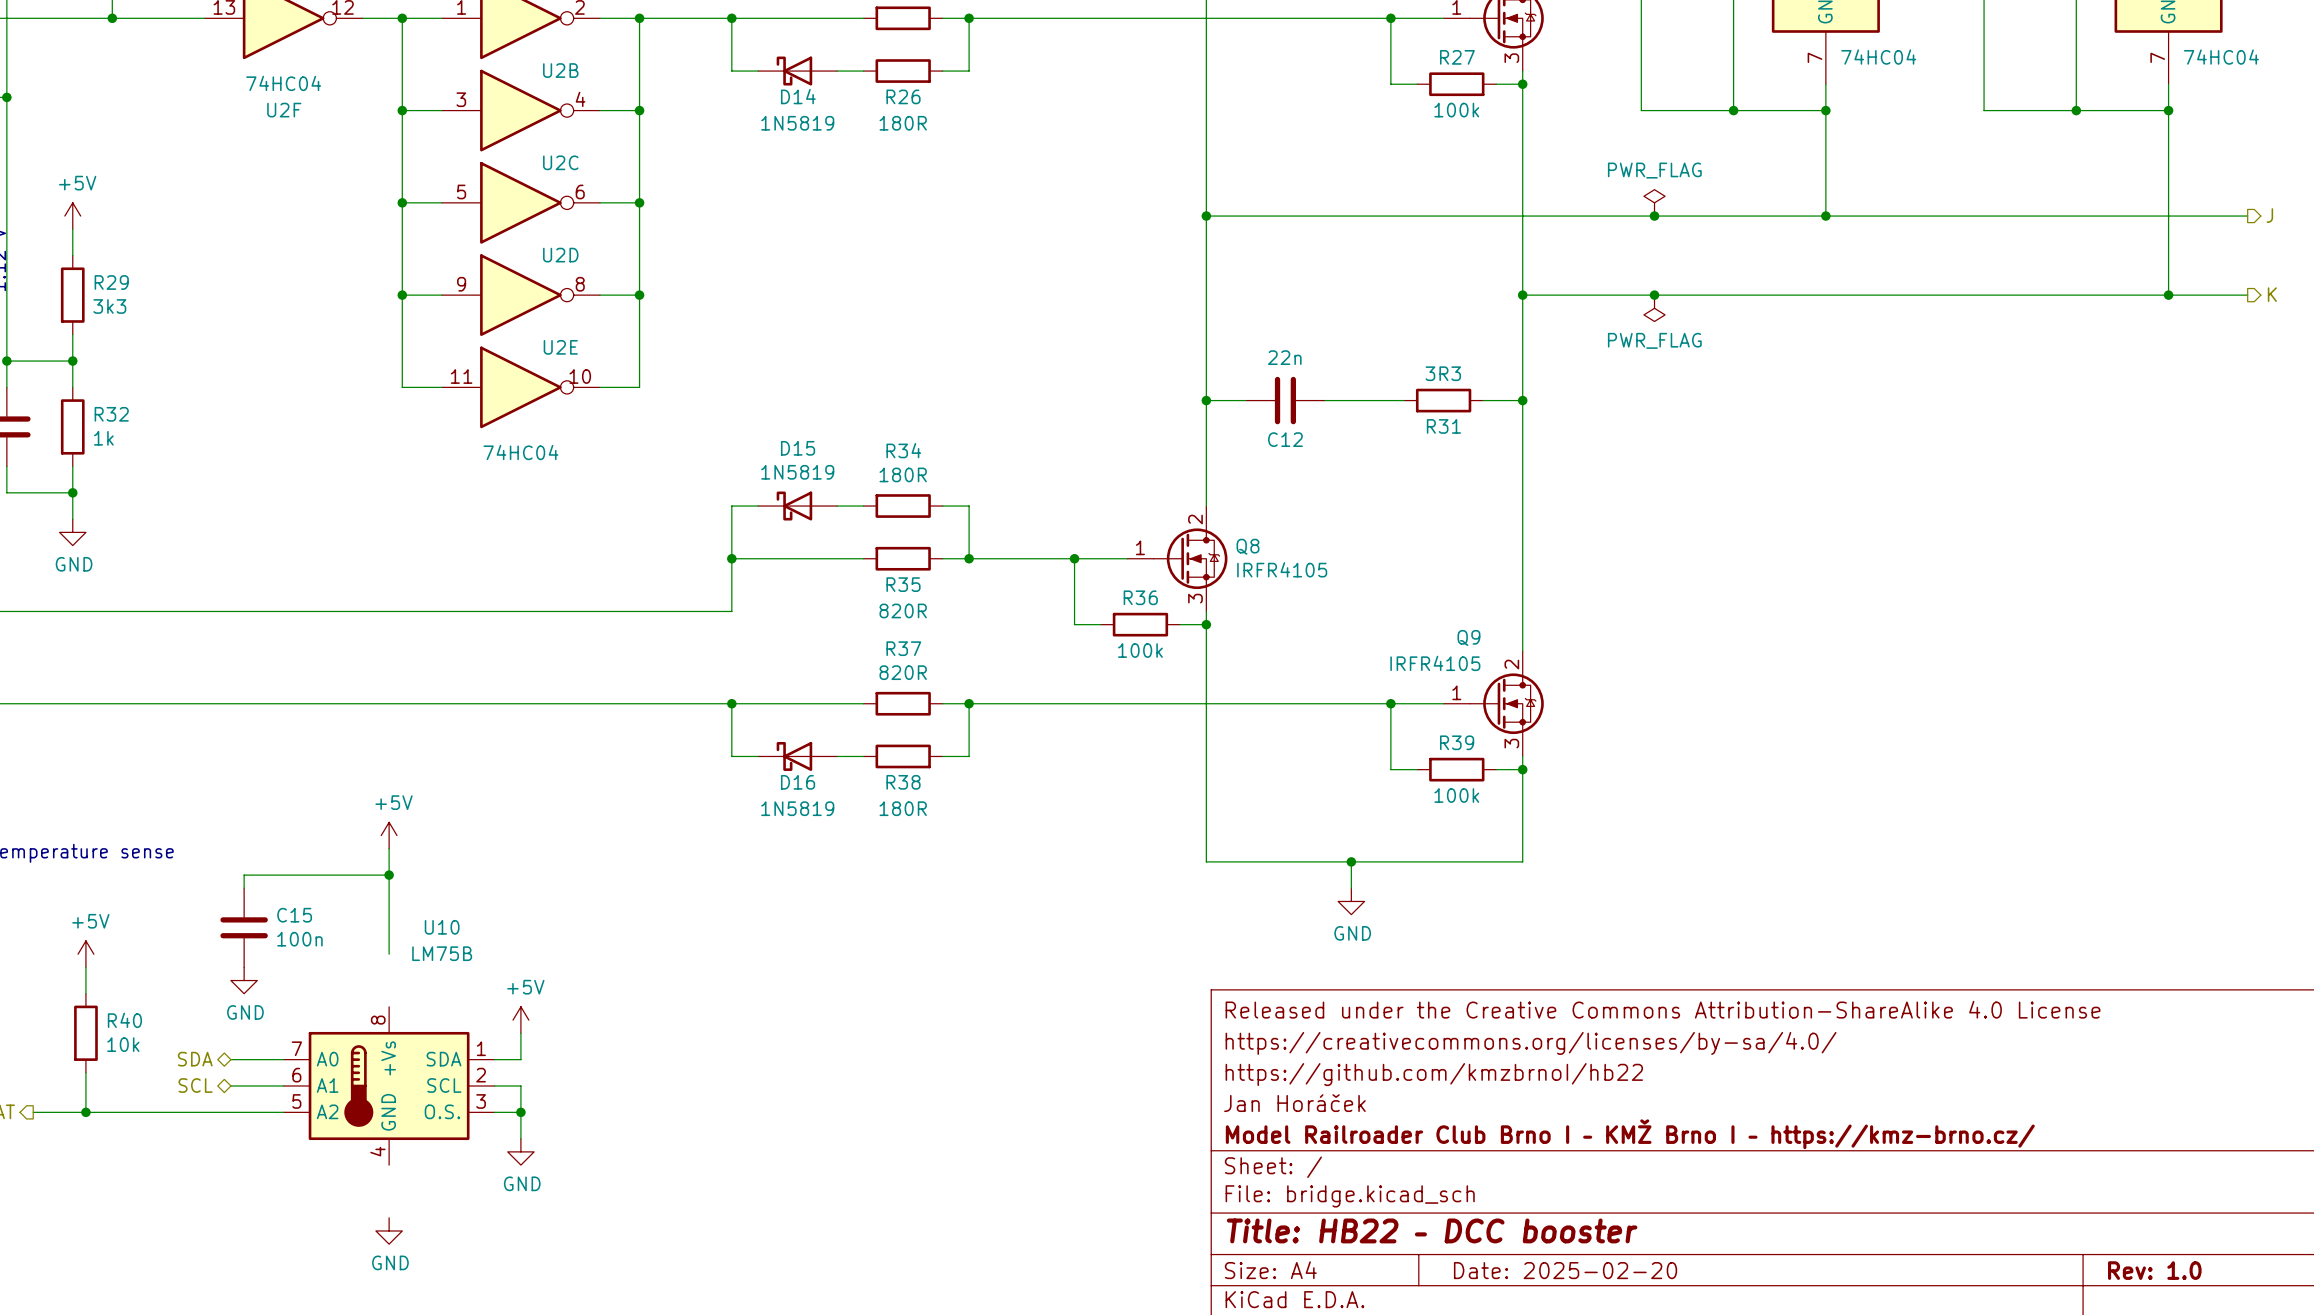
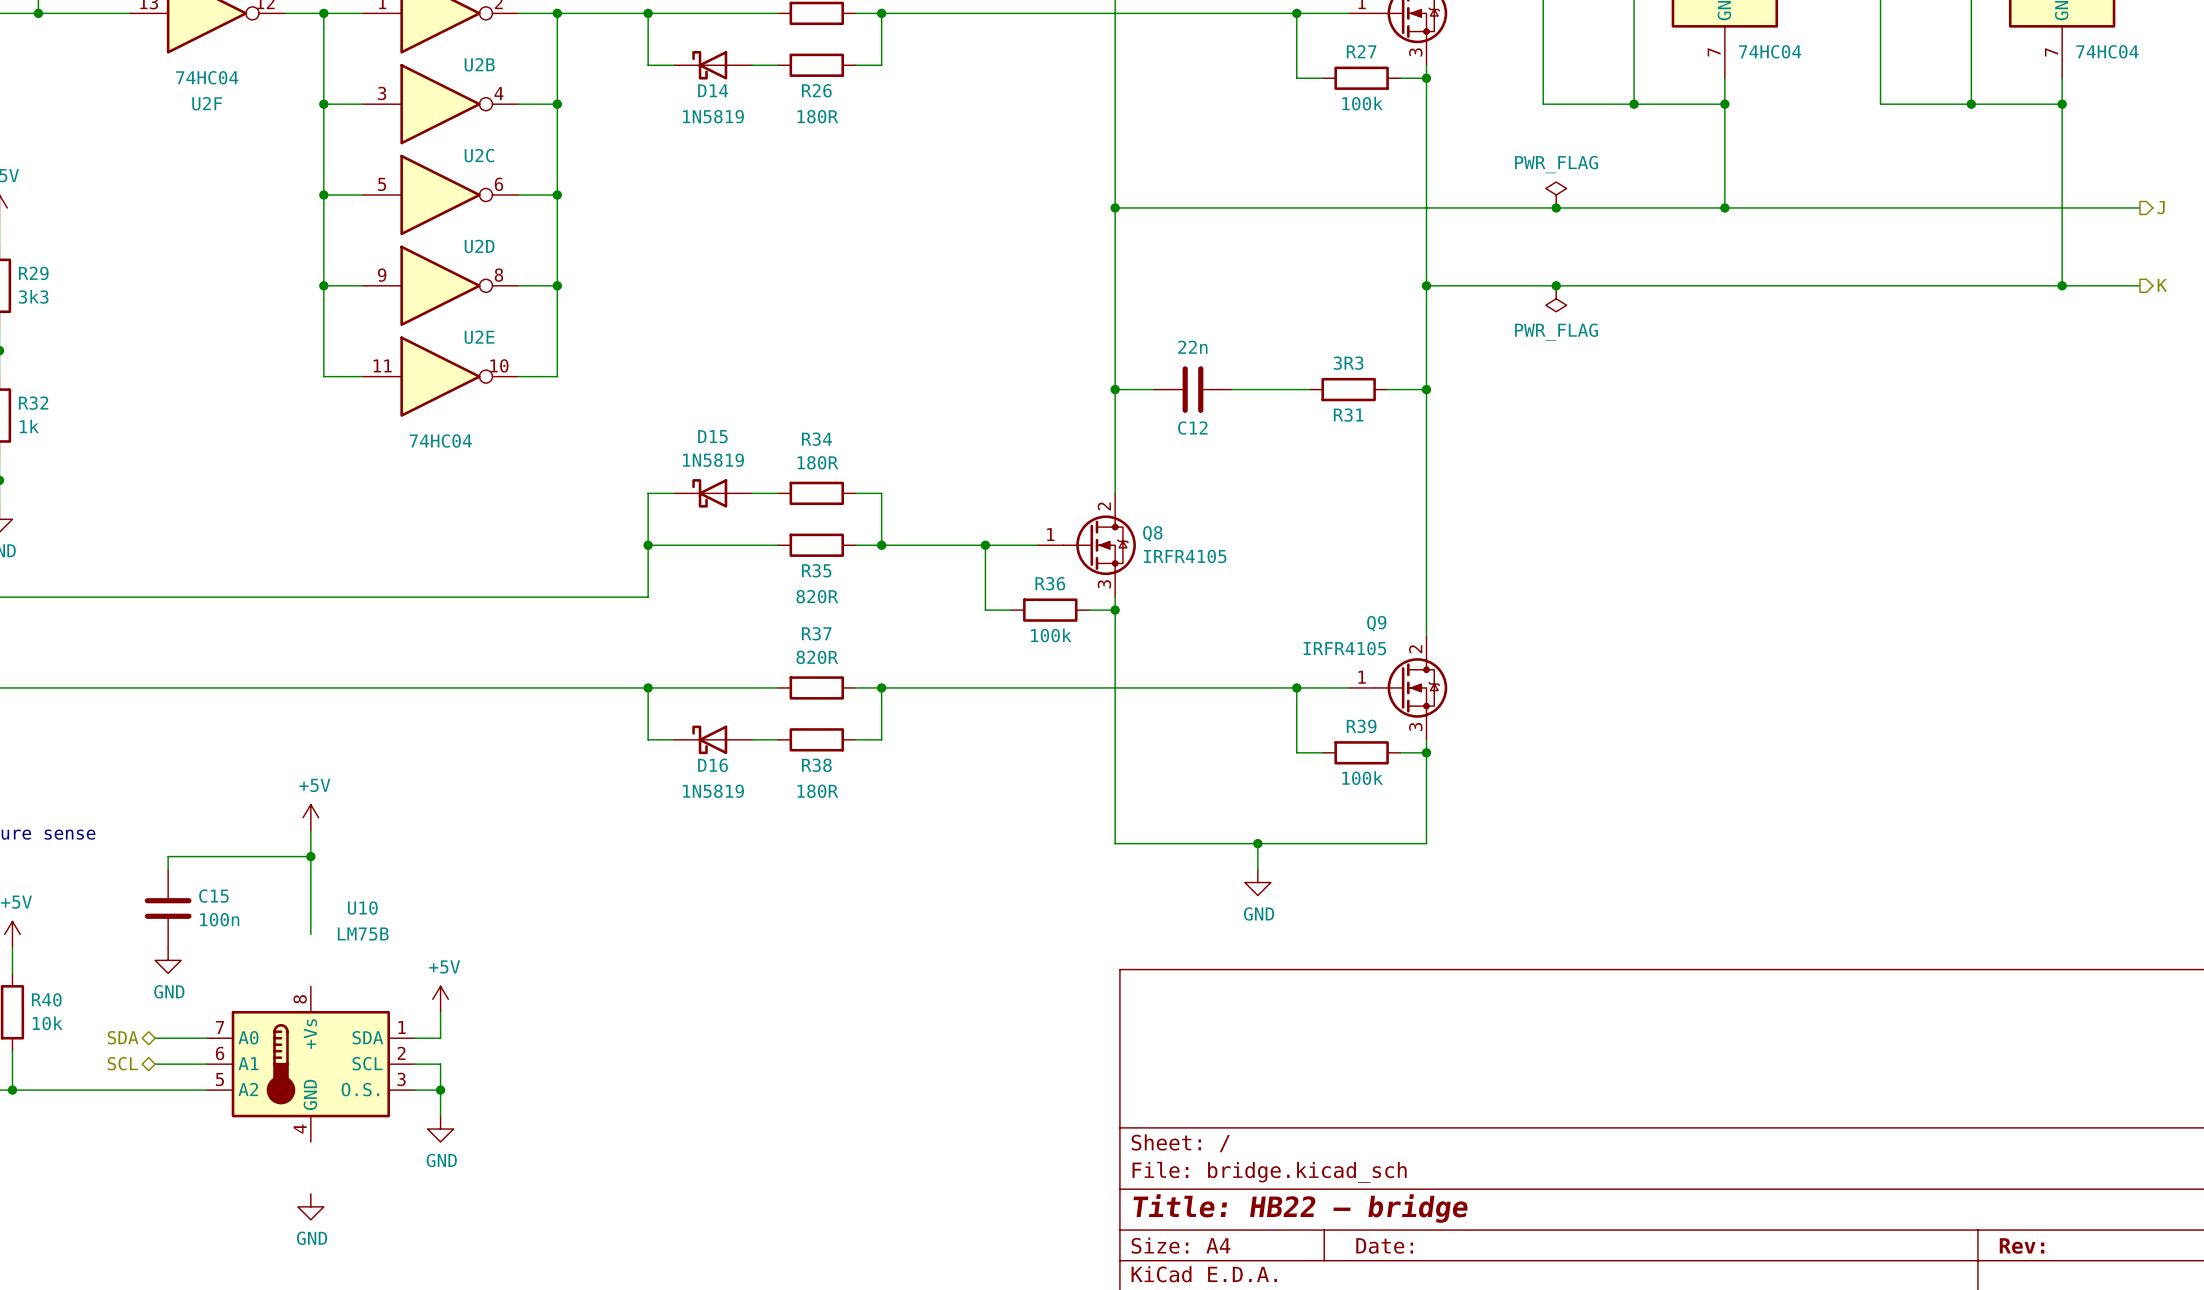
title block: Released under the Creative Commons Attribution-ShareAlike 4.0 License (1663, 1009) -> none
title block: https://creativecommons.org/licenses/by-sa/4.0/ (1531, 1043) -> none
title block: https://github.com/kmzbrnoI/hb22 (1434, 1074) -> none
title block: Jan Horáček (1294, 1103) -> none
title block: Model Railroader Club Brno I – KMŽ Brno I – https://kmz-brno.cz/ (1630, 1134) -> none
title block: Title: HB22 – DCC booster (1432, 1230) -> Title: HB22 – bridge (1300, 1208)
title block: Date: 2025-02-20 (1565, 1270) -> Date: (1384, 1245)
title block: Rev: 1.0 (2154, 1270) -> Rev: (2022, 1245)

